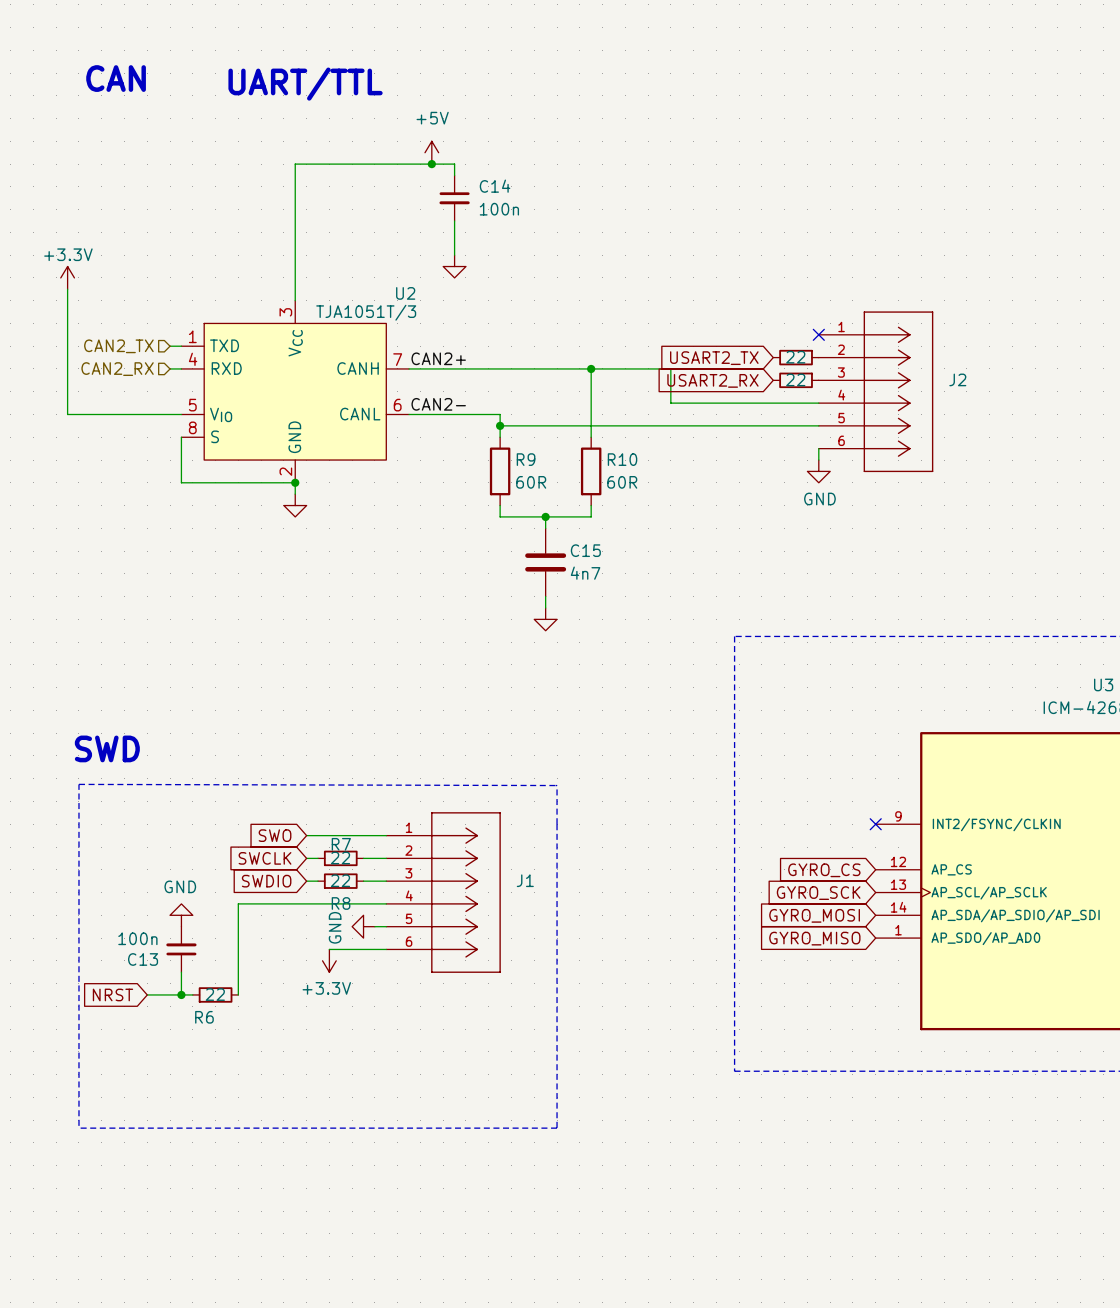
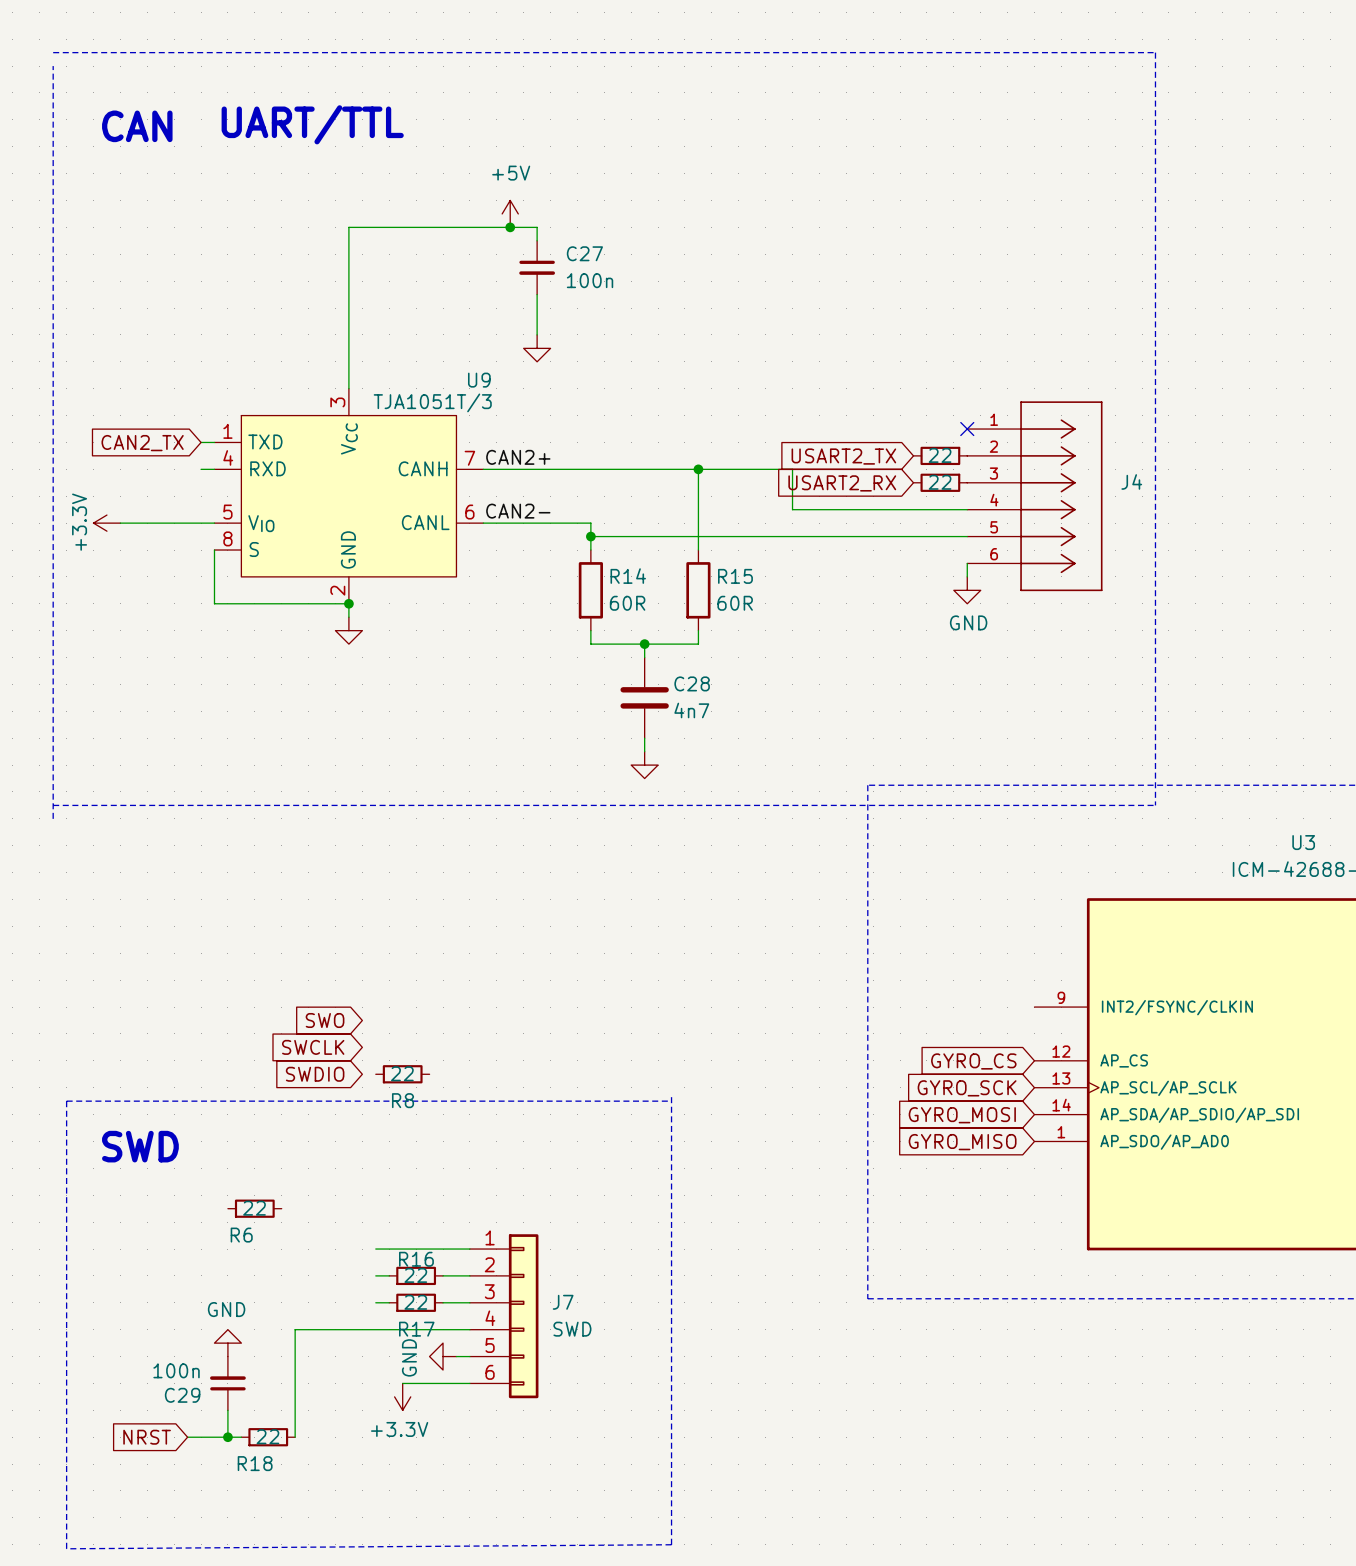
line: none -> (53, 52) (1155, 52) (1155, 805) (53, 805)
line: none -> (53, 66) (53, 818)
text position: UART/TTL (305, 84) -> UART/TTL (312, 124)
C14 name: C14 (495, 186) -> C27 (584, 253)
power symbol rotation: 0° (67, 277) -> 90° counterclockwise (106, 523)
power symbol position: +3.3V (67, 277) -> +3.3V (106, 523)
wire: (67, 289) (67, 414) (101, 414) -> none
U2 name: U2 (405, 293) -> U9 (479, 380)
hierarchical label: CAN2_TX (118, 346) -> none
global label: none -> CAN2_TX (142, 443)
hierarchical label: CAN2_RX (117, 369) -> none
J2 name: J2 (957, 379) -> J4 (1131, 481)
R9 name: R9 (526, 459) -> R14 (628, 576)
R10 name: R10 (622, 459) -> R15 (735, 576)
C15 name: C15 (585, 550) -> C28 (692, 683)
text position: SWD (107, 748) -> SWD (140, 1146)
line: (557, 785) (78, 784) (78, 1125) -> none
line: (557, 785) (557, 1128) (78, 1128) -> none
no-connect mark: (875, 824) -> none
wire: (306, 835) (386, 835) -> (375, 1249) (469, 1249)
wire: (306, 858) (318, 858) -> (375, 1275) (389, 1275)
R7: 22 (340, 858) -> none
wire: (363, 858) (386, 858) -> (443, 1275) (469, 1275)
wire: (306, 881) (318, 881) -> (375, 1302) (389, 1302)
wire: (363, 881) (386, 881) -> (443, 1302) (469, 1302)
J1: (443, 892) -> none
line: none -> (671, 1097) (671, 1544) (66, 1548) (66, 1101) (671, 1101)
wire: (386, 903) (238, 903) (238, 994) -> (469, 1329) (295, 1329) (295, 1437)
power symbol: GND (181, 915) -> none
power symbol: GND (363, 926) -> none
wire: (374, 926) (386, 926) -> (456, 1356) (469, 1356)
C13: 100n (181, 949) -> none
wire: (329, 949) (386, 949) -> (402, 1383) (469, 1383)
power symbol position: +3.3V (329, 960) -> +3.3V (402, 1396)
wire: (181, 972) (181, 994) -> (227, 1410) (227, 1437)
global label position: NRST (112, 994) -> NRST (147, 1437)
wire: (147, 994) (192, 994) -> (187, 1437) (241, 1437)
junction: (181, 994) -> none
R16: none -> 22 (416, 1275)
R17: none -> 22 (416, 1302)
J7: none -> SWD (504, 1316)
power symbol: none -> GND (227, 1343)
power symbol: none -> GND (443, 1356)
C29: none -> 100n (227, 1383)
junction: none -> (227, 1437)
R18: none -> 22 (268, 1437)

